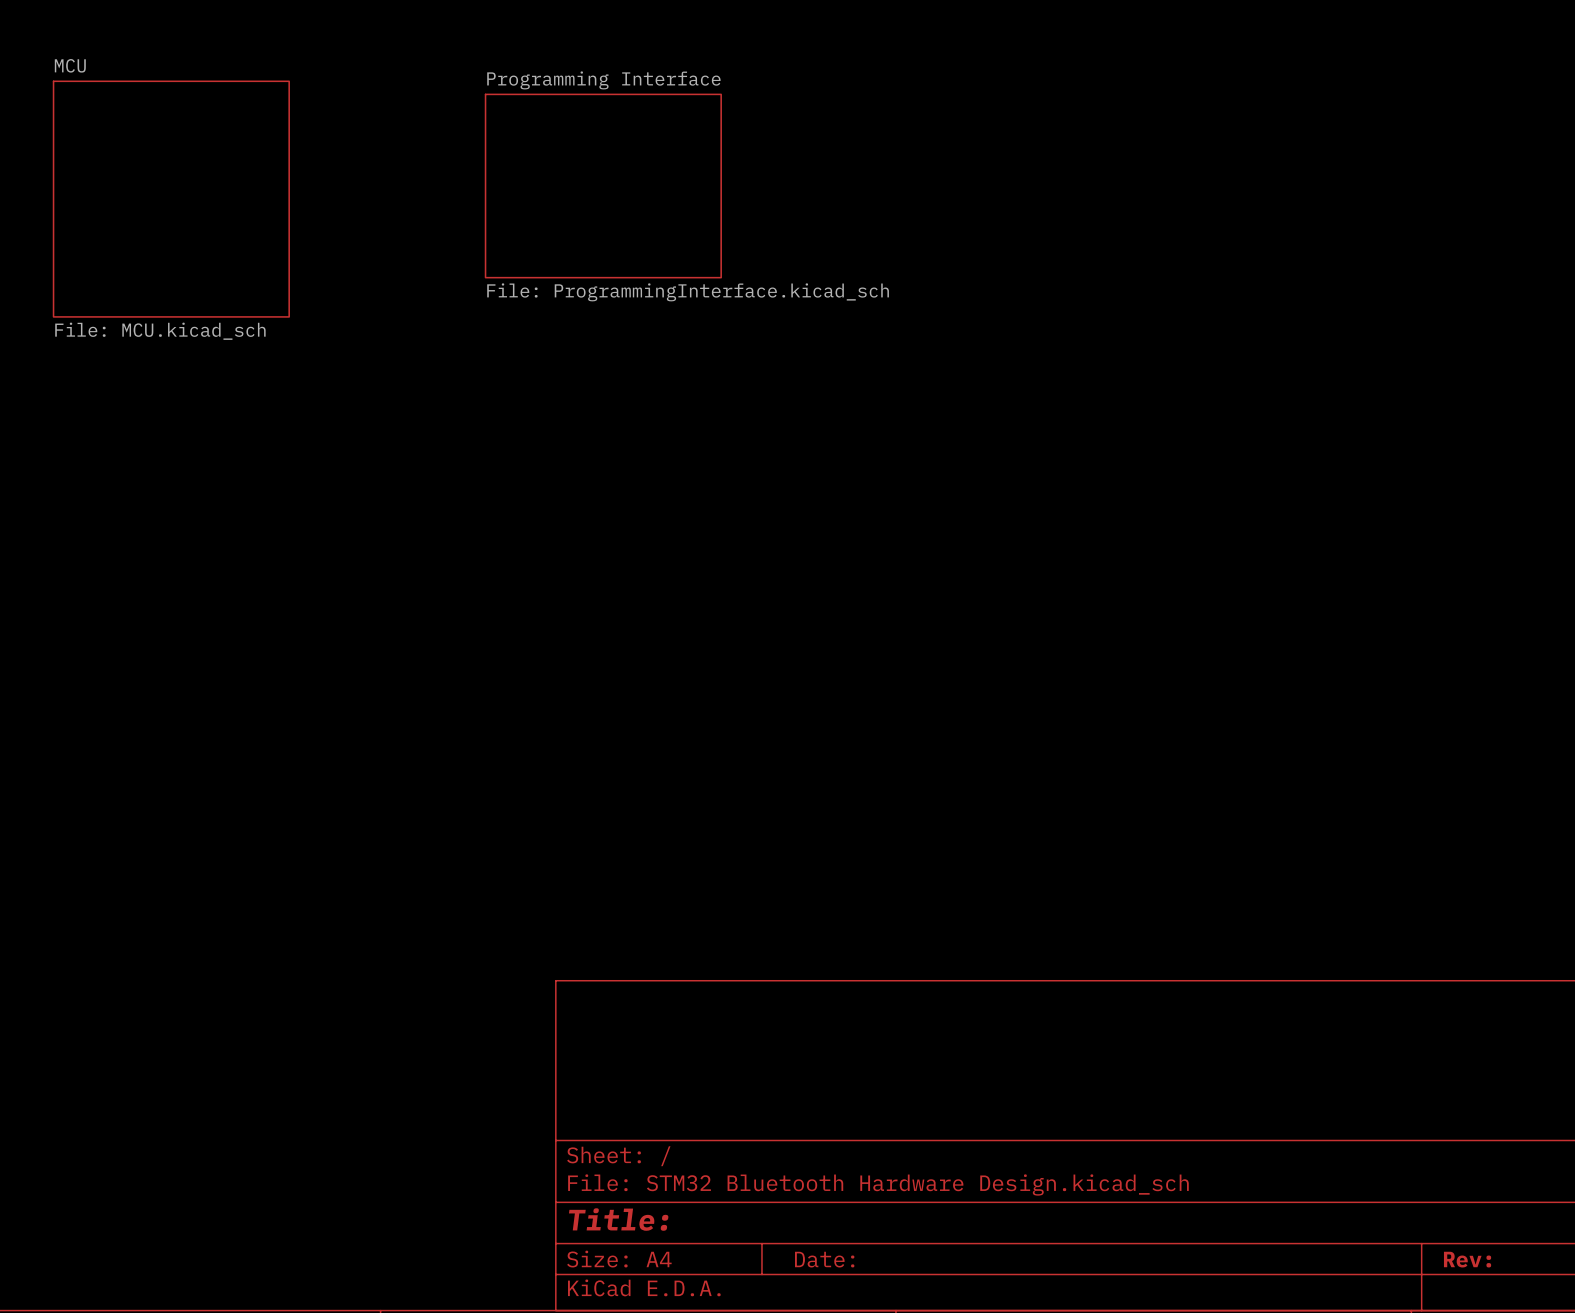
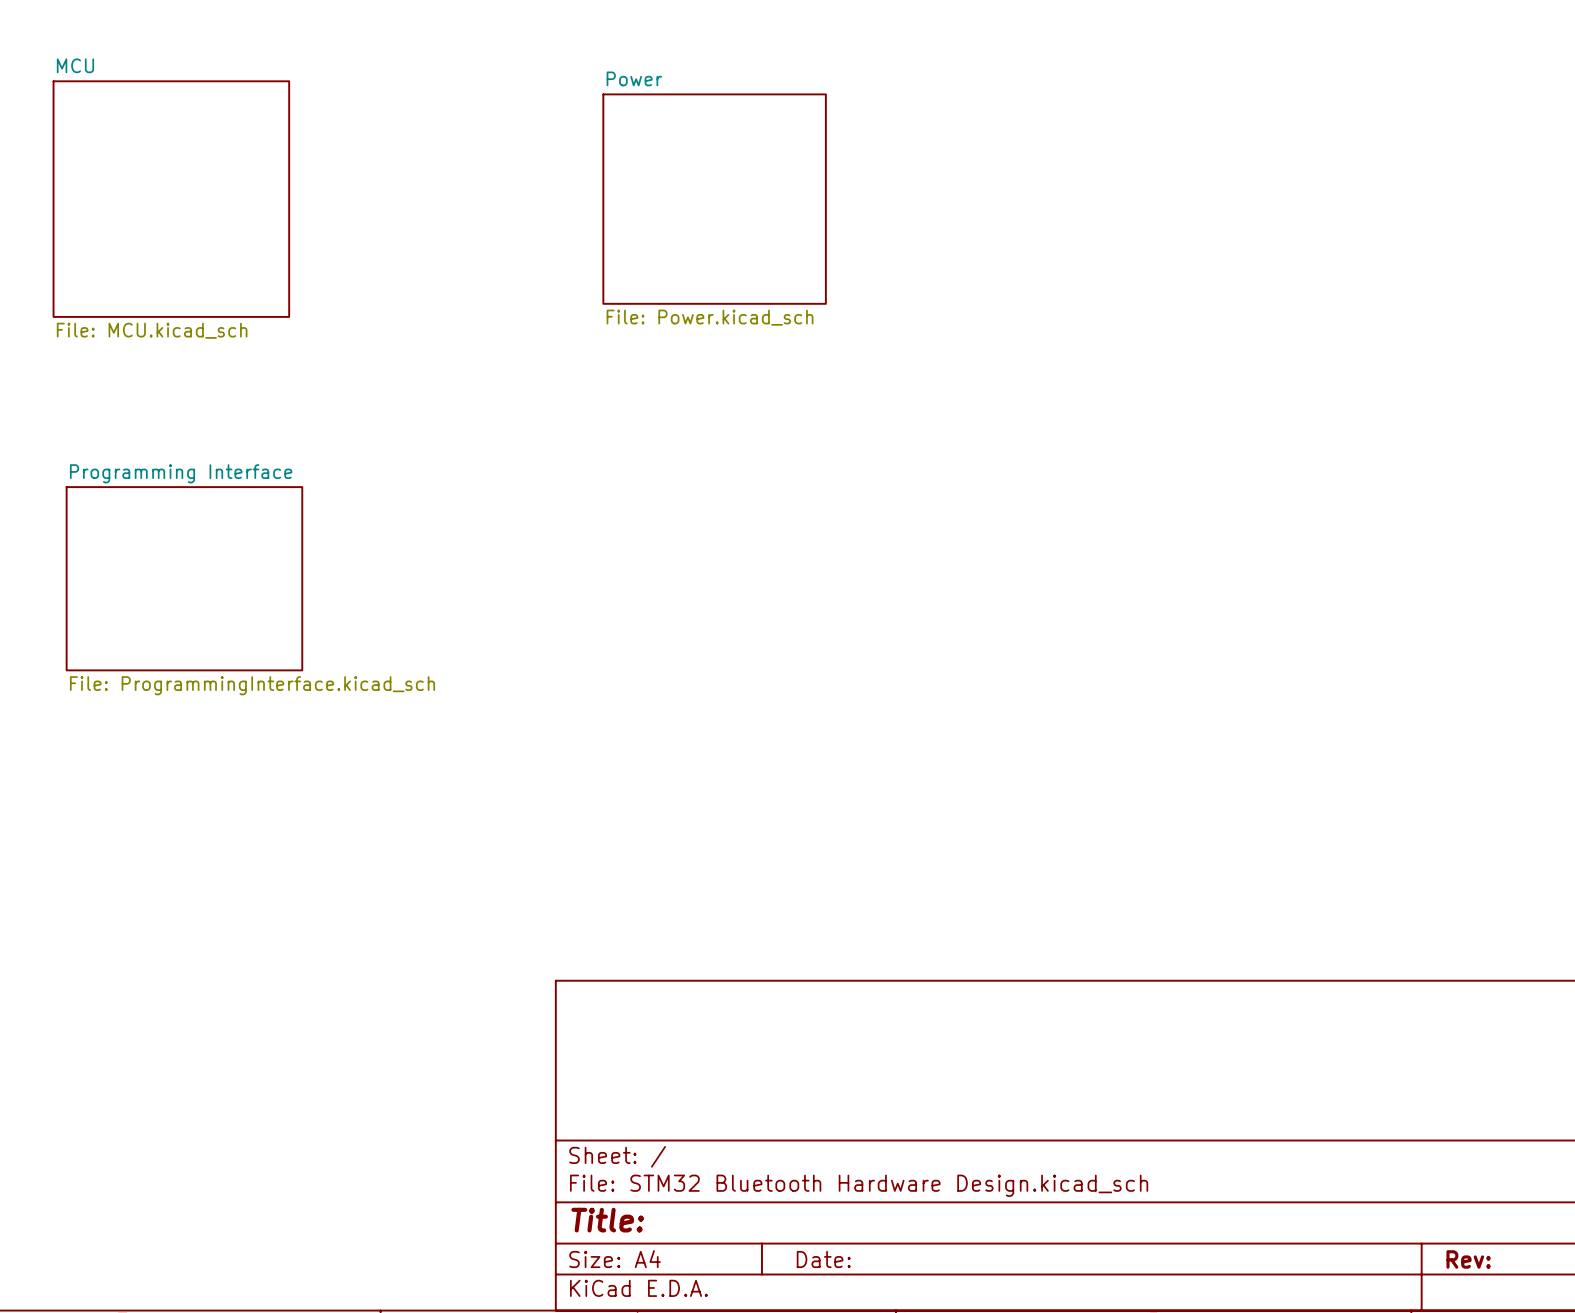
sheet Programming Interface: File: ProgrammingInterface.kicad_sch (603, 186) -> none
sheet Power: none -> File: Power.kicad_sch (714, 199)
sheet Programming Interface: none -> File: ProgrammingInterface.kicad_sch (184, 578)

